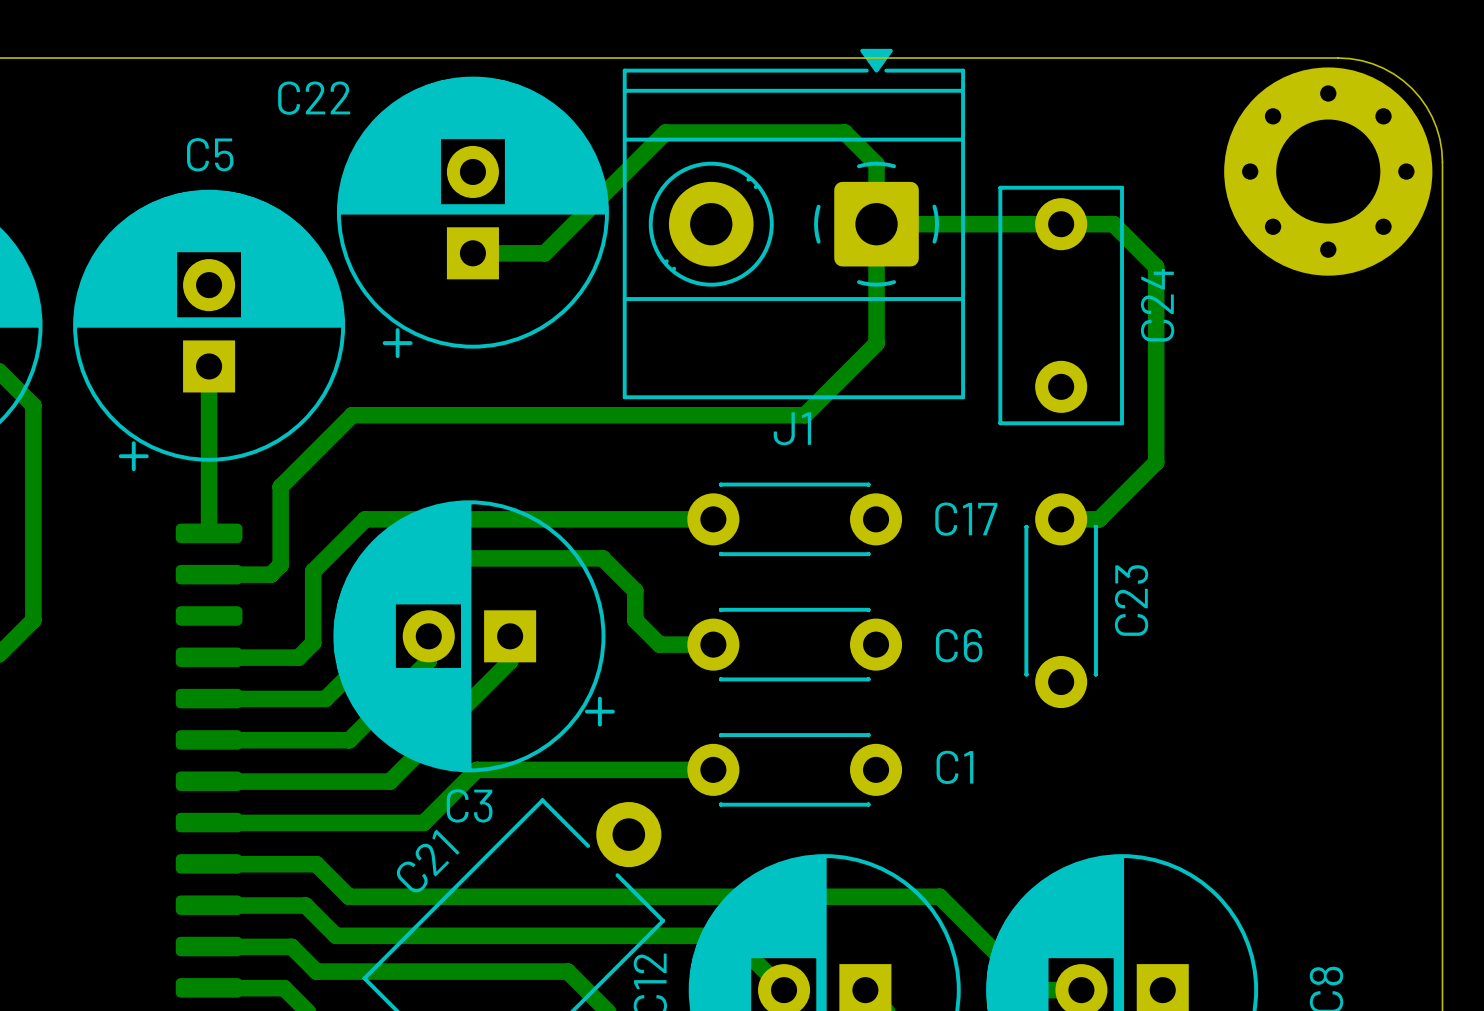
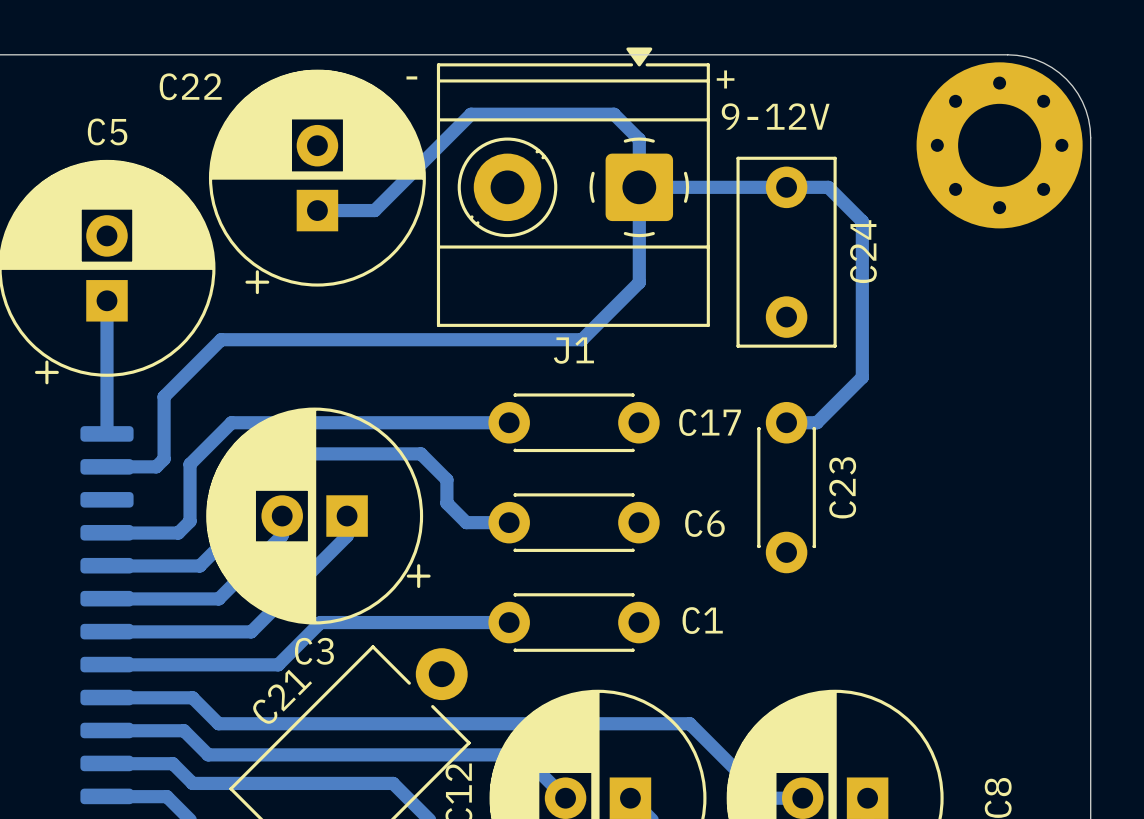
text: none -> - (411, 77)
text: none -> + (725, 79)
text: none -> 9-12V (775, 116)

